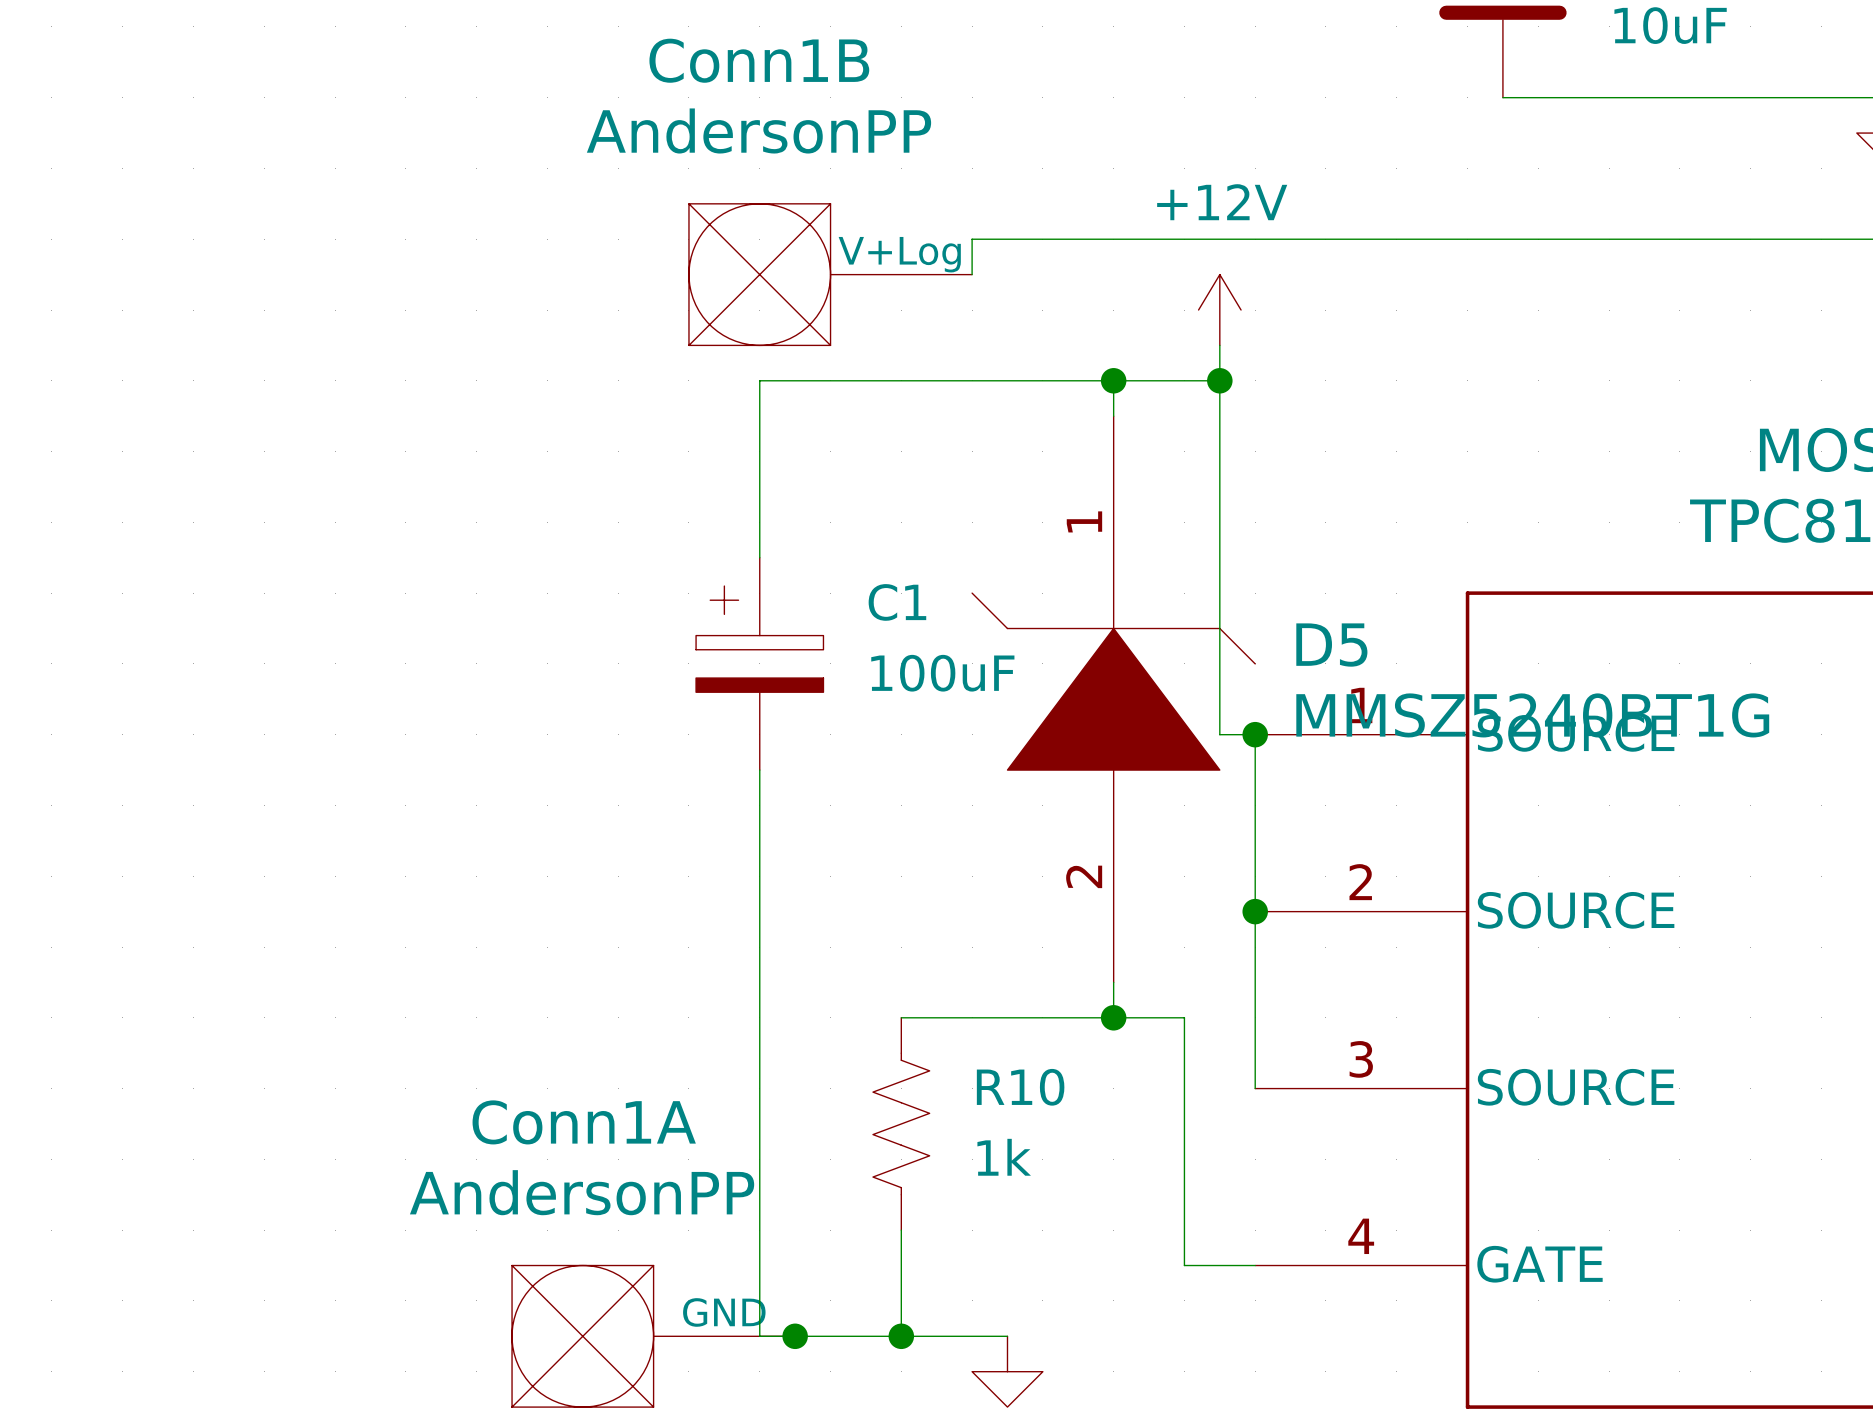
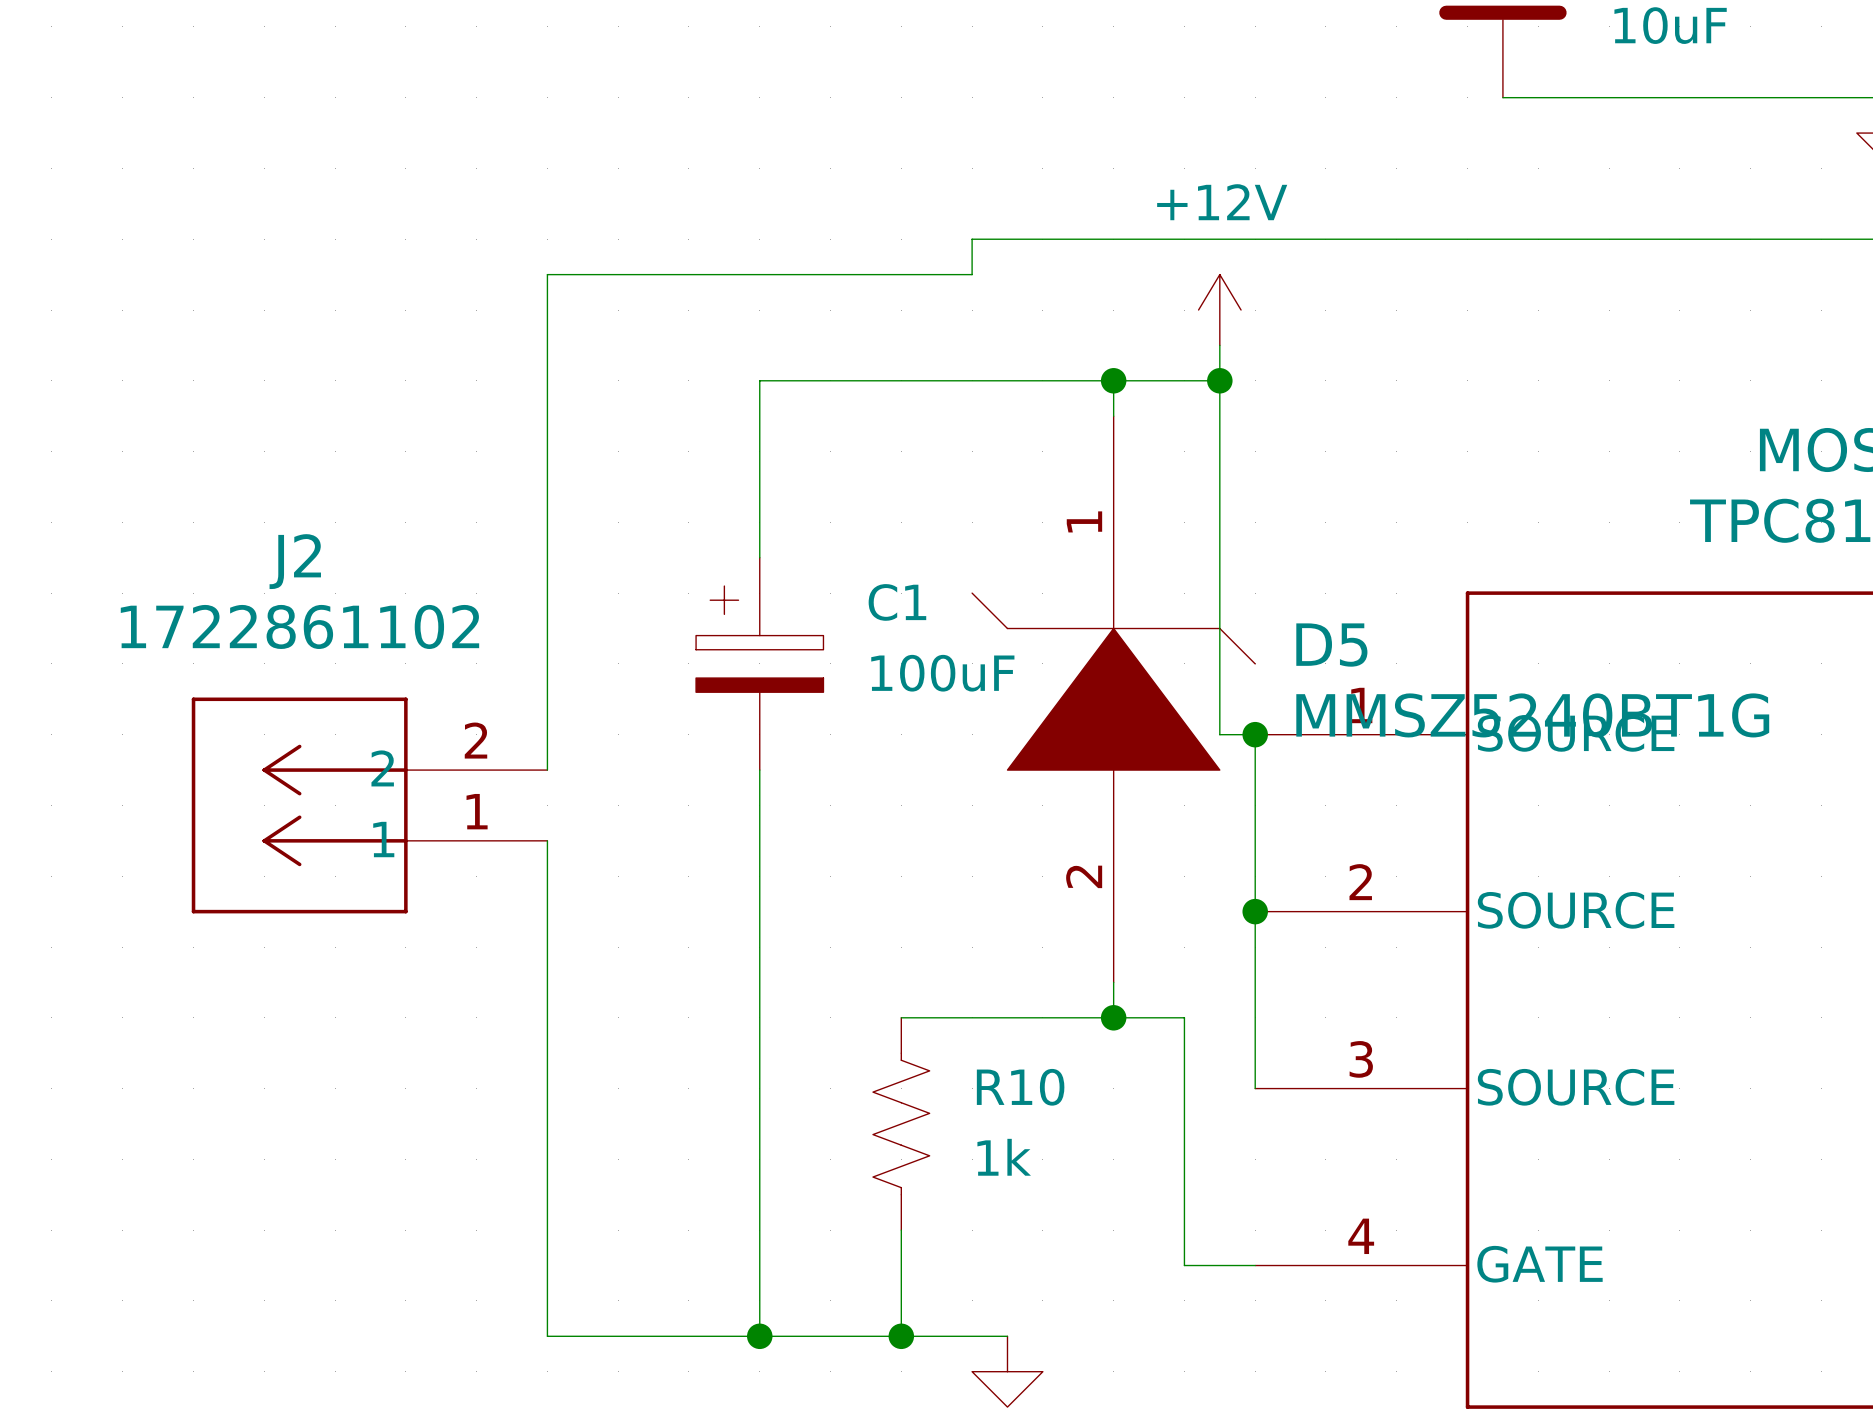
Conn1B: AndersonPP (830, 274) -> none
wire: none -> (972, 274) (547, 274) (547, 770)
J2: none -> 1722861102 (369, 805)
wire: none -> (547, 840) (547, 1336) (759, 1336)
Conn1A: AndersonPP (653, 1336) -> none
junction position: (795, 1336) -> (759, 1336)

